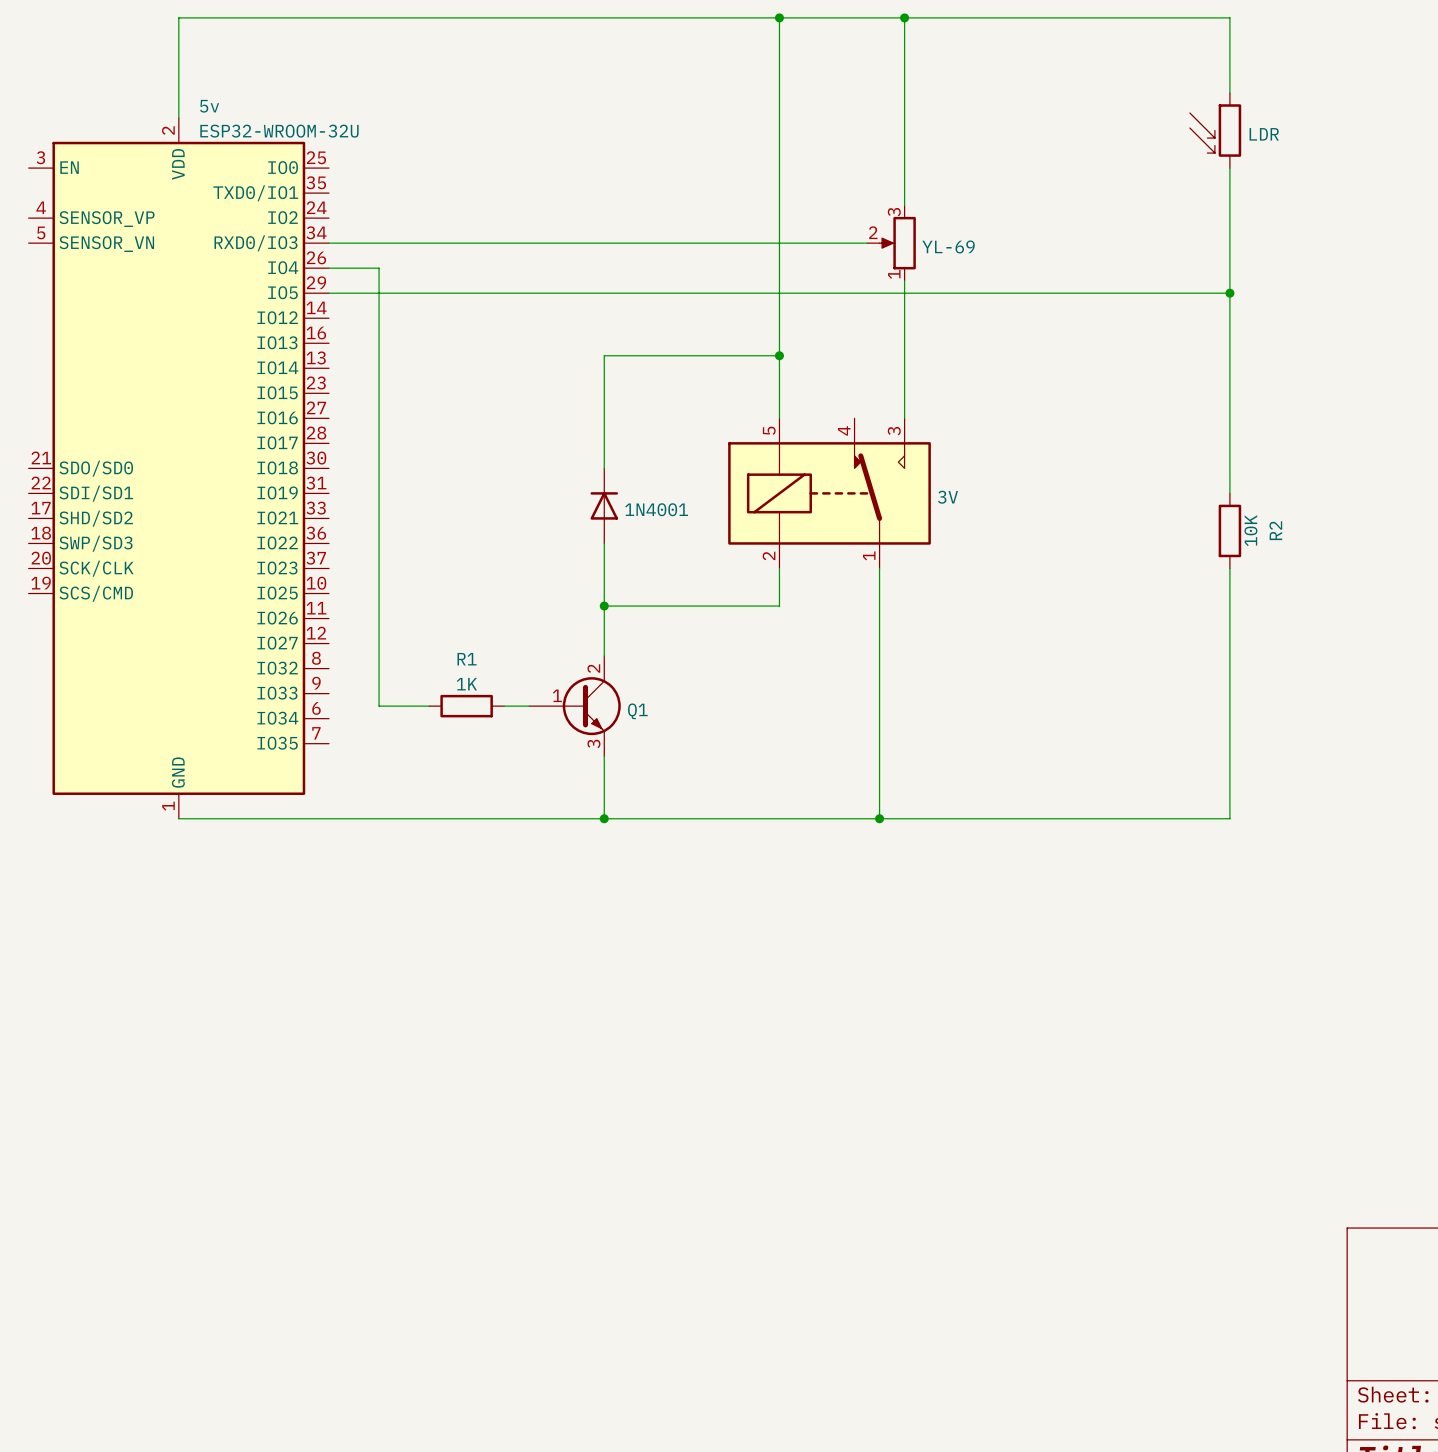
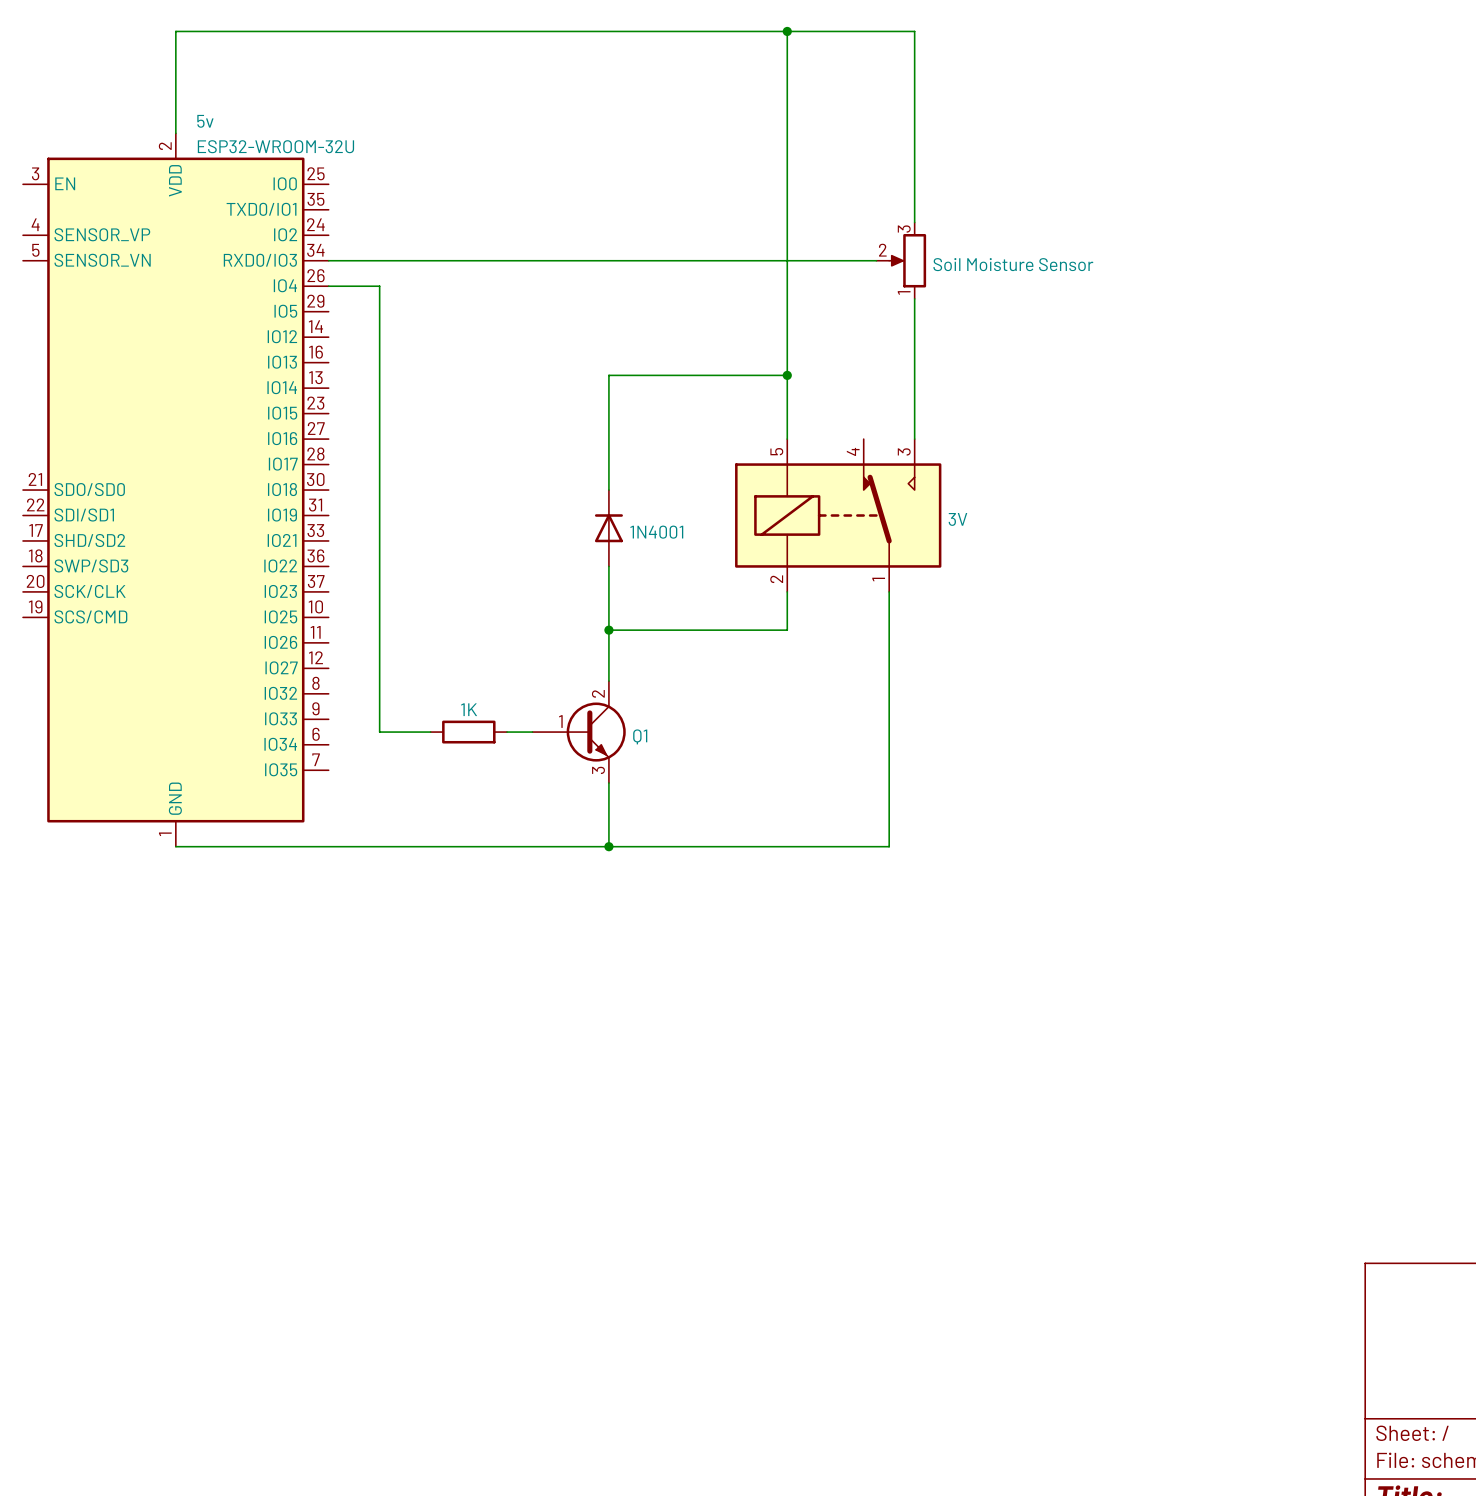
wire: (904, 17) (1229, 17) (1229, 92) -> none
junction: (904, 17) -> none
LDR: (1215, 130) -> none
wire: (1229, 168) (1229, 493) -> none
part value: YL-69 (948, 246) -> Soil Moisture Sensor (1013, 264)
wire: (328, 293) (1229, 293) -> none
junction: (1229, 293) -> none
R2: 10K (1229, 530) -> none
wire: (1229, 568) (1229, 818) (879, 818) -> none
R1 name: R1 (467, 659) -> none
junction: (879, 818) -> none

